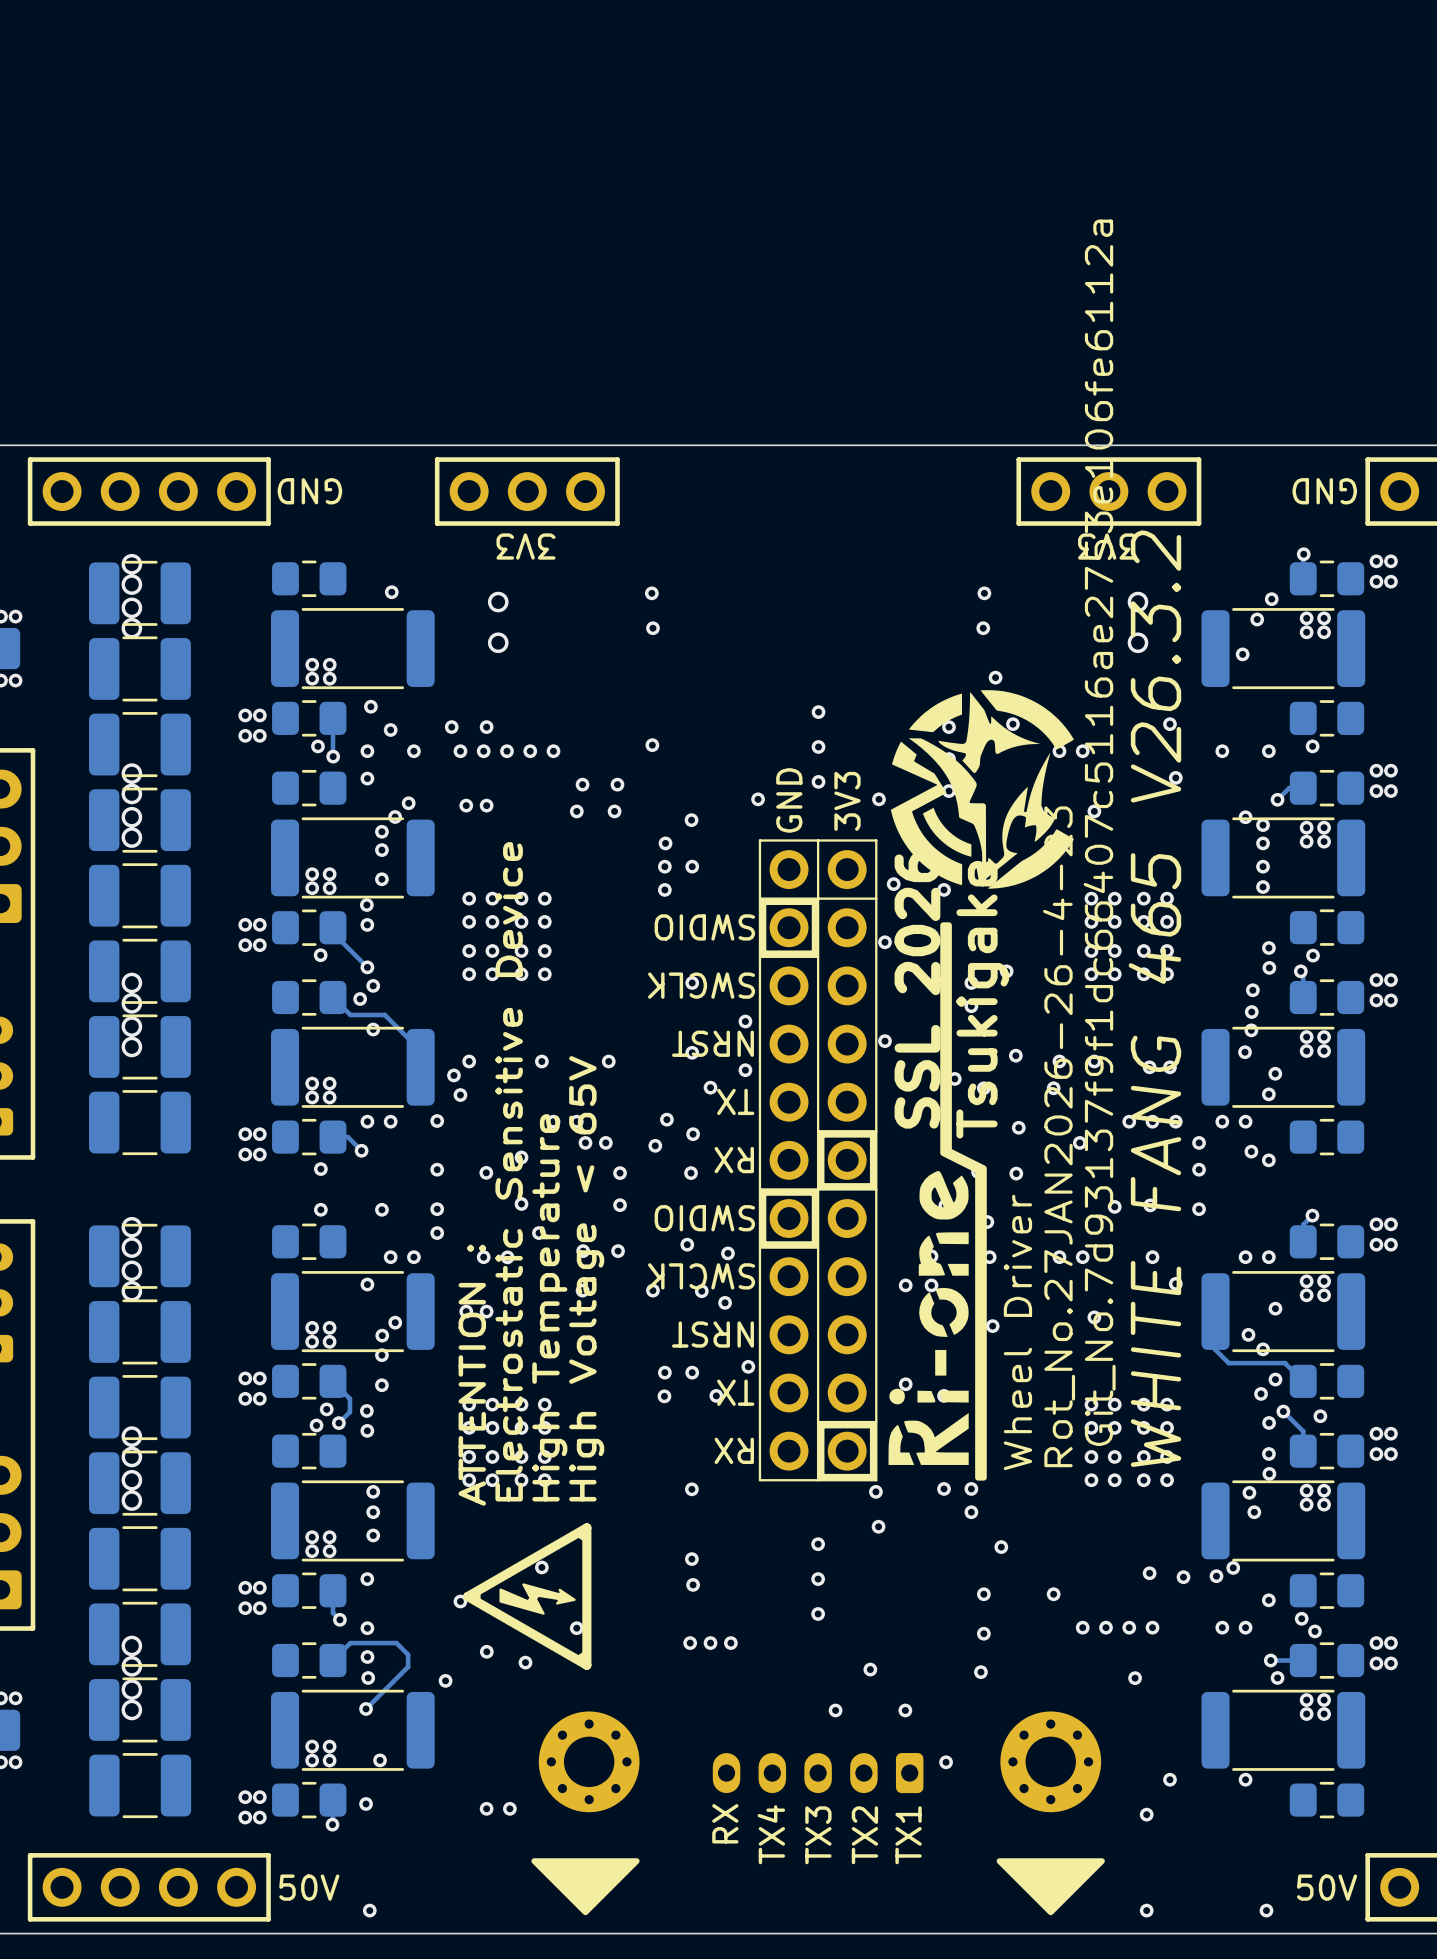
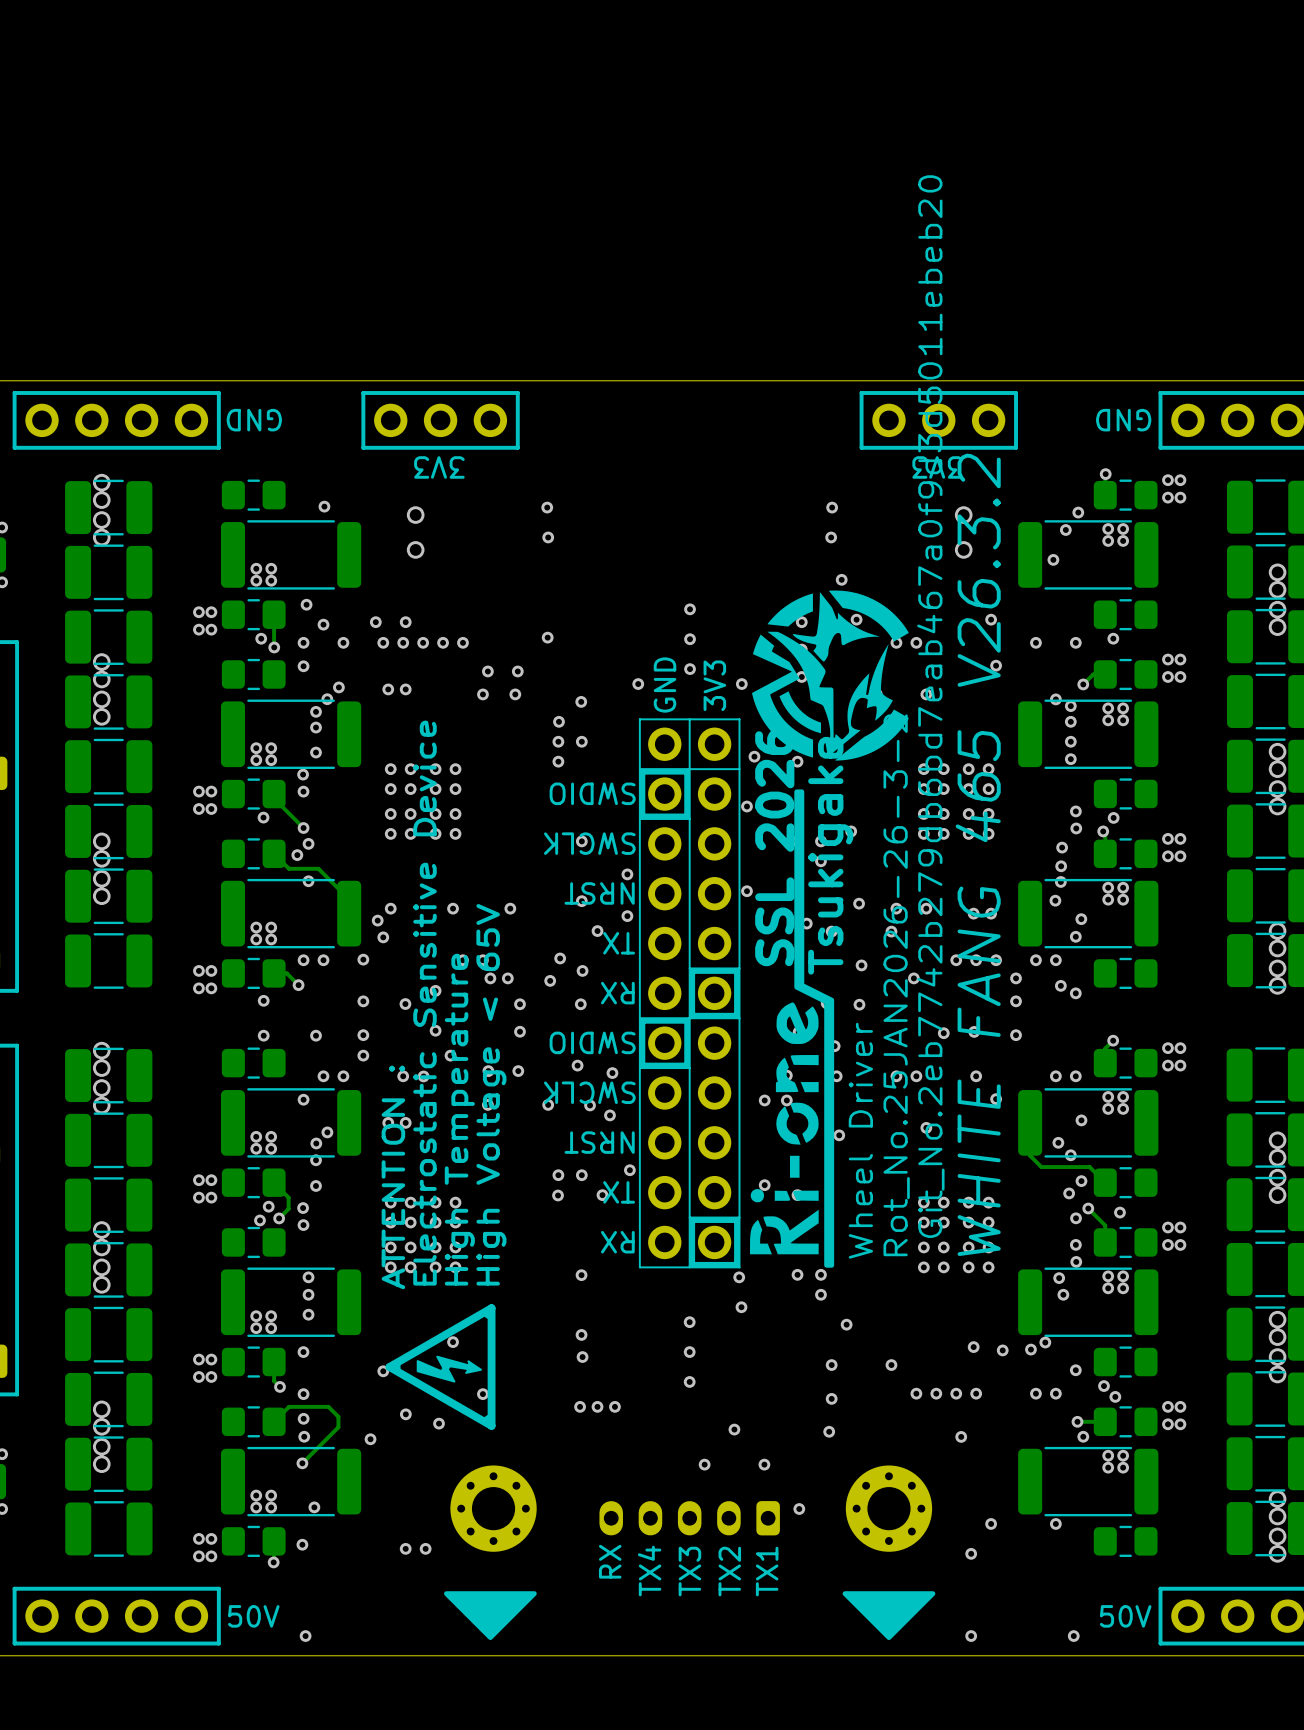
text: Git_No.7d93137f9f1dc66407c5116ae2753e106fe6112a (1099, 832) -> Git_No.2eb7742b279db6bd7eab467a0f9d3d5011ebeb20 (930, 706)
text: Rot_No.27JAN2026-26-4-23 (1059, 1136) -> Rot_No.25JAN2026-26-3-2 (896, 985)

